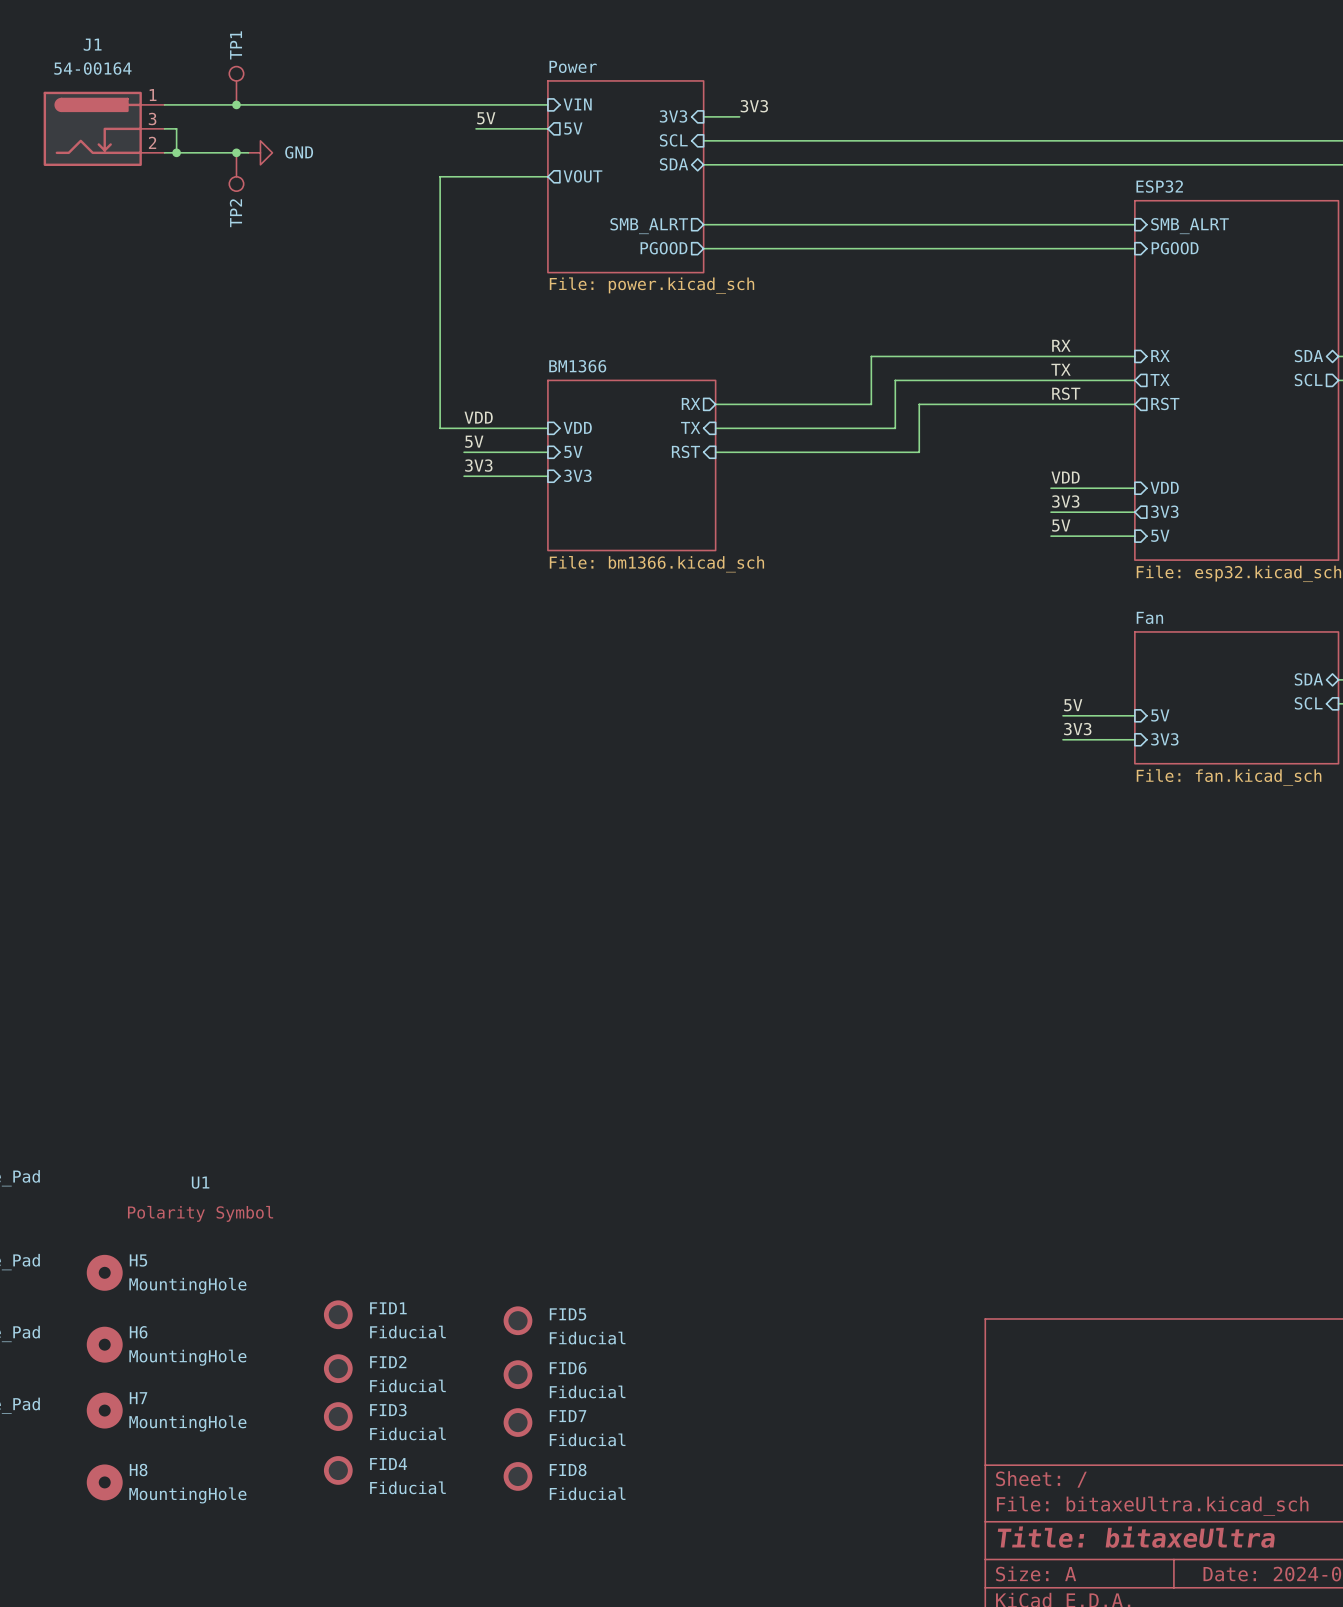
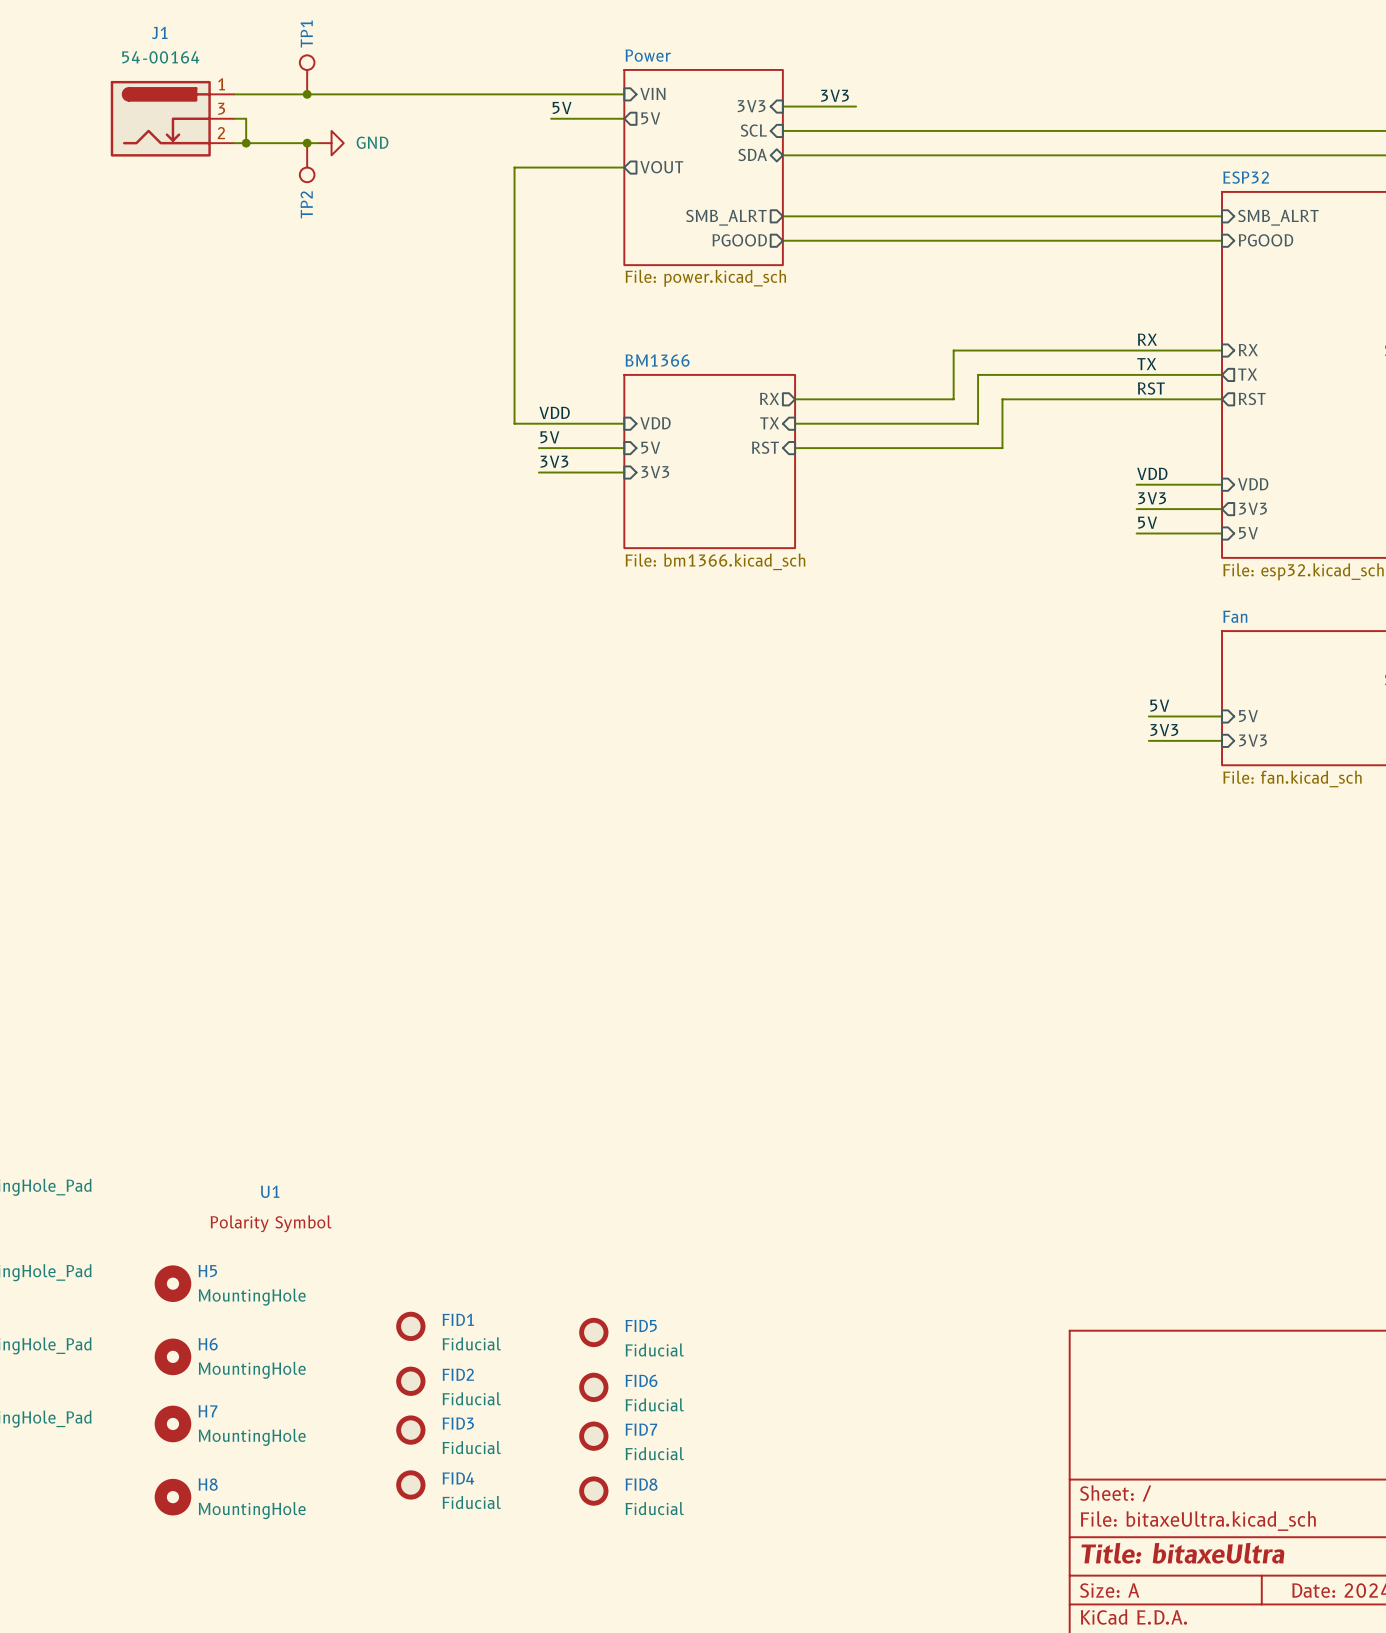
wire: none -> (819, 106) (856, 106)

